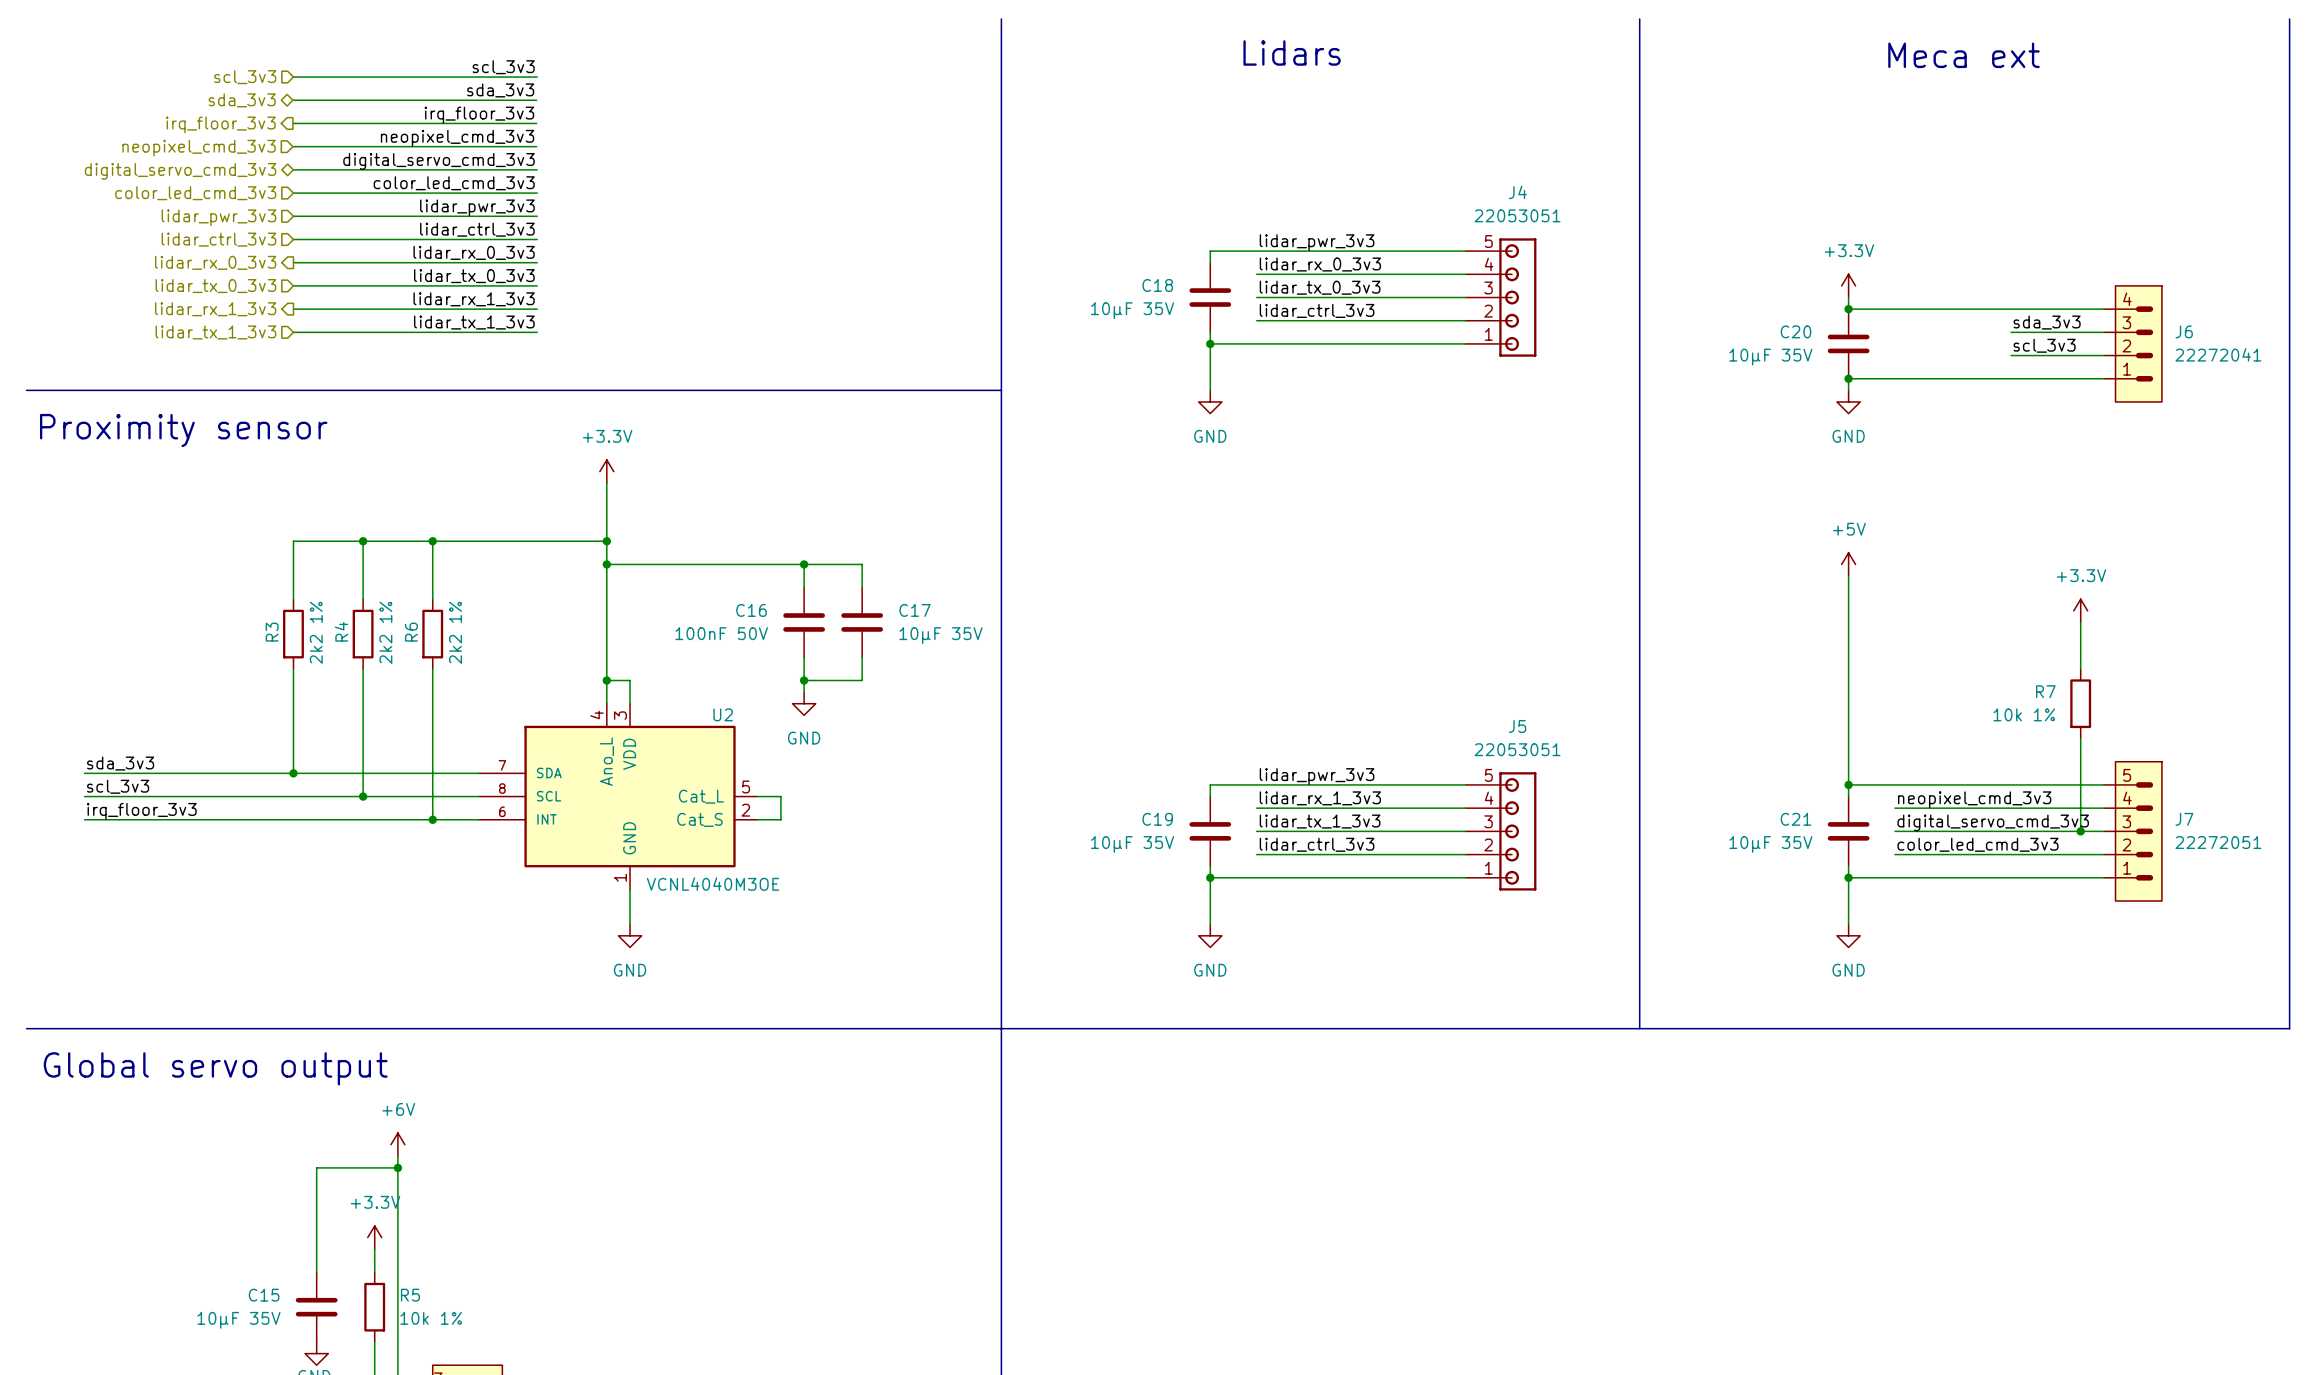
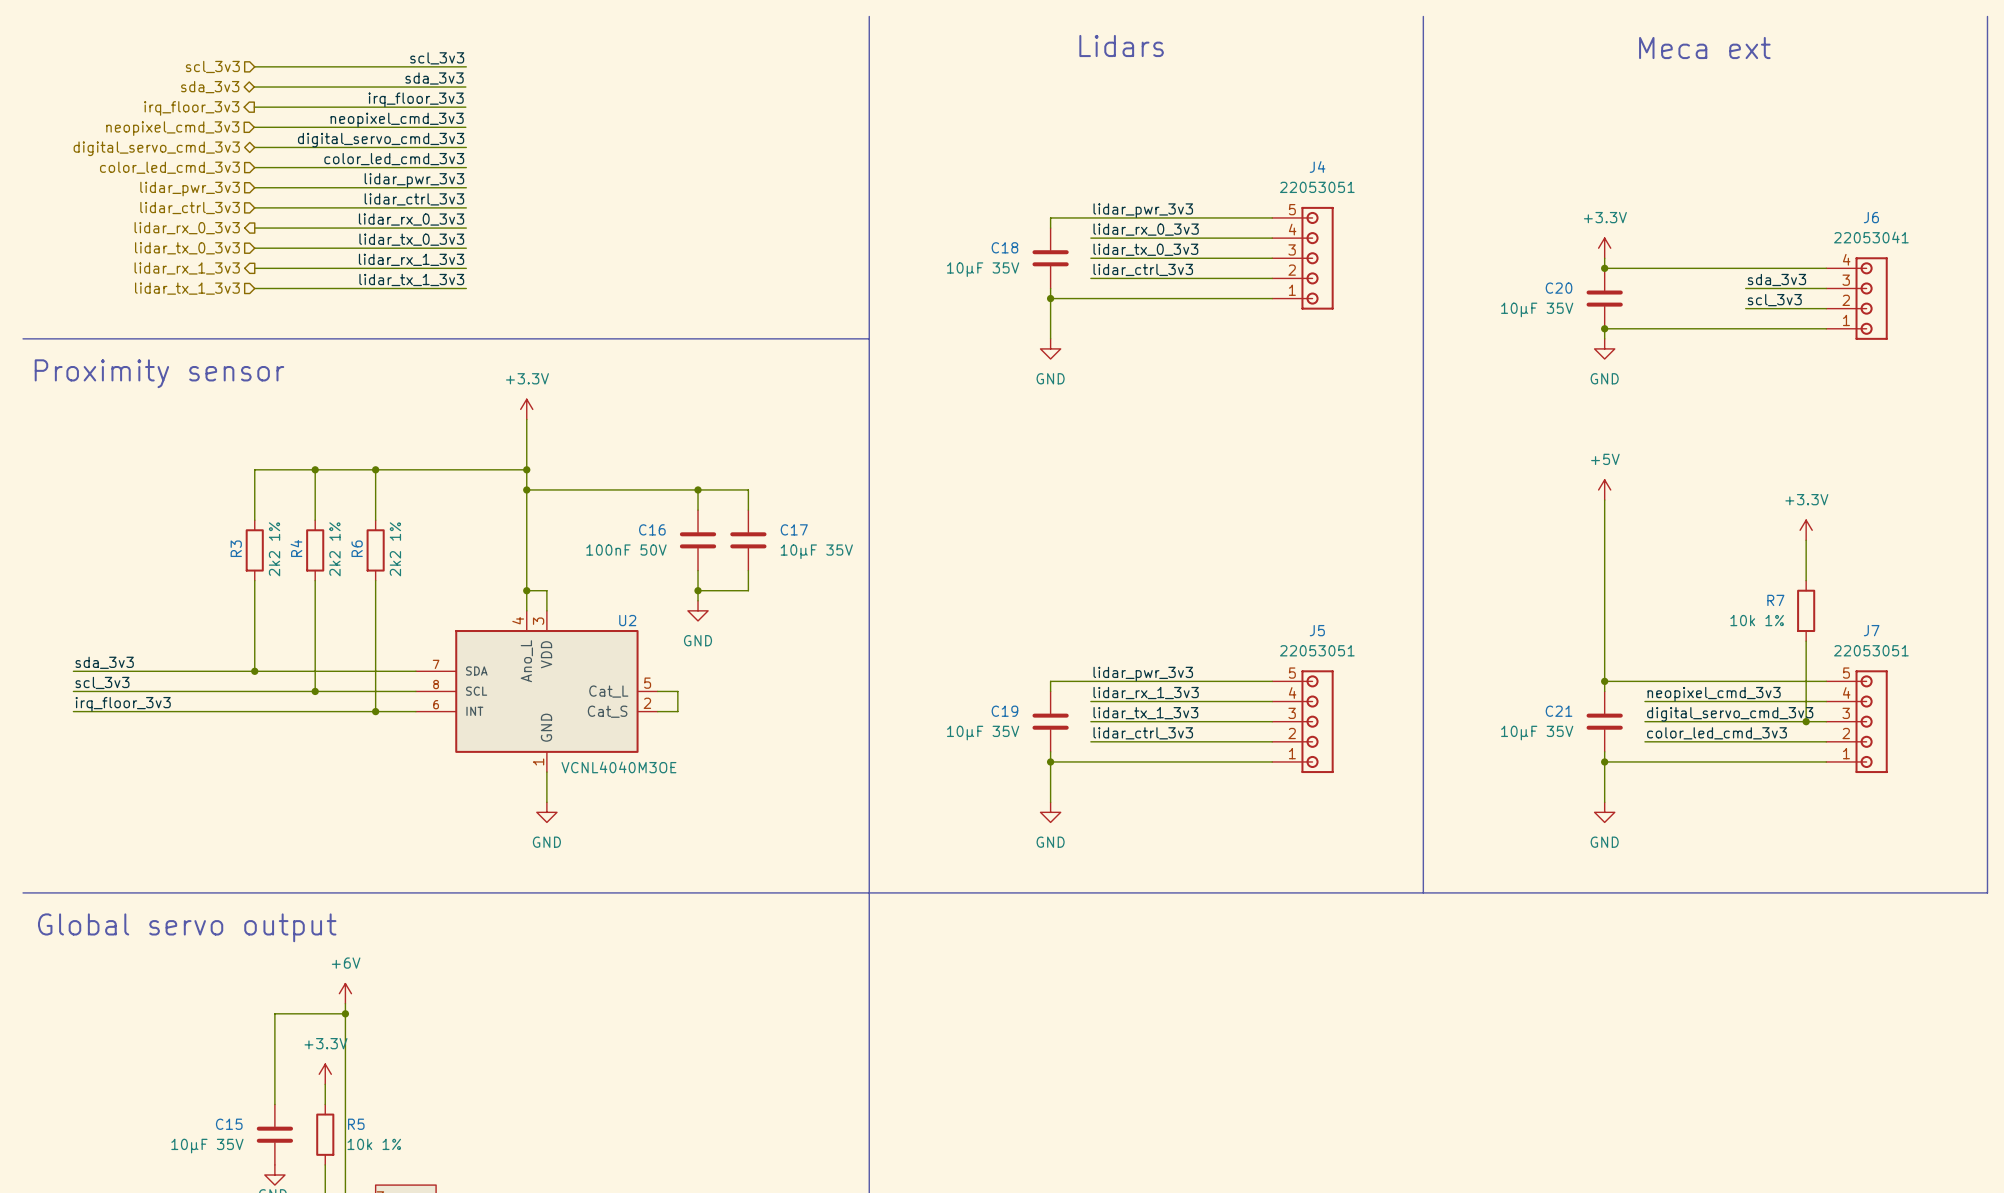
J6 symbol: [2103, 285, 2162, 402] -> [1826, 257, 1888, 340]
J6 name position: J6 (2184, 331) -> J6 (1871, 217)
J6 value: 22272041 (2218, 354) -> 22053041 (1871, 237)
J7 symbol: [2103, 761, 2162, 902] -> [1826, 670, 1888, 774]
J7 name position: J7 (2184, 819) -> J7 (1871, 630)
J7 value: 22272051 (2218, 842) -> 22053051 (1871, 650)

